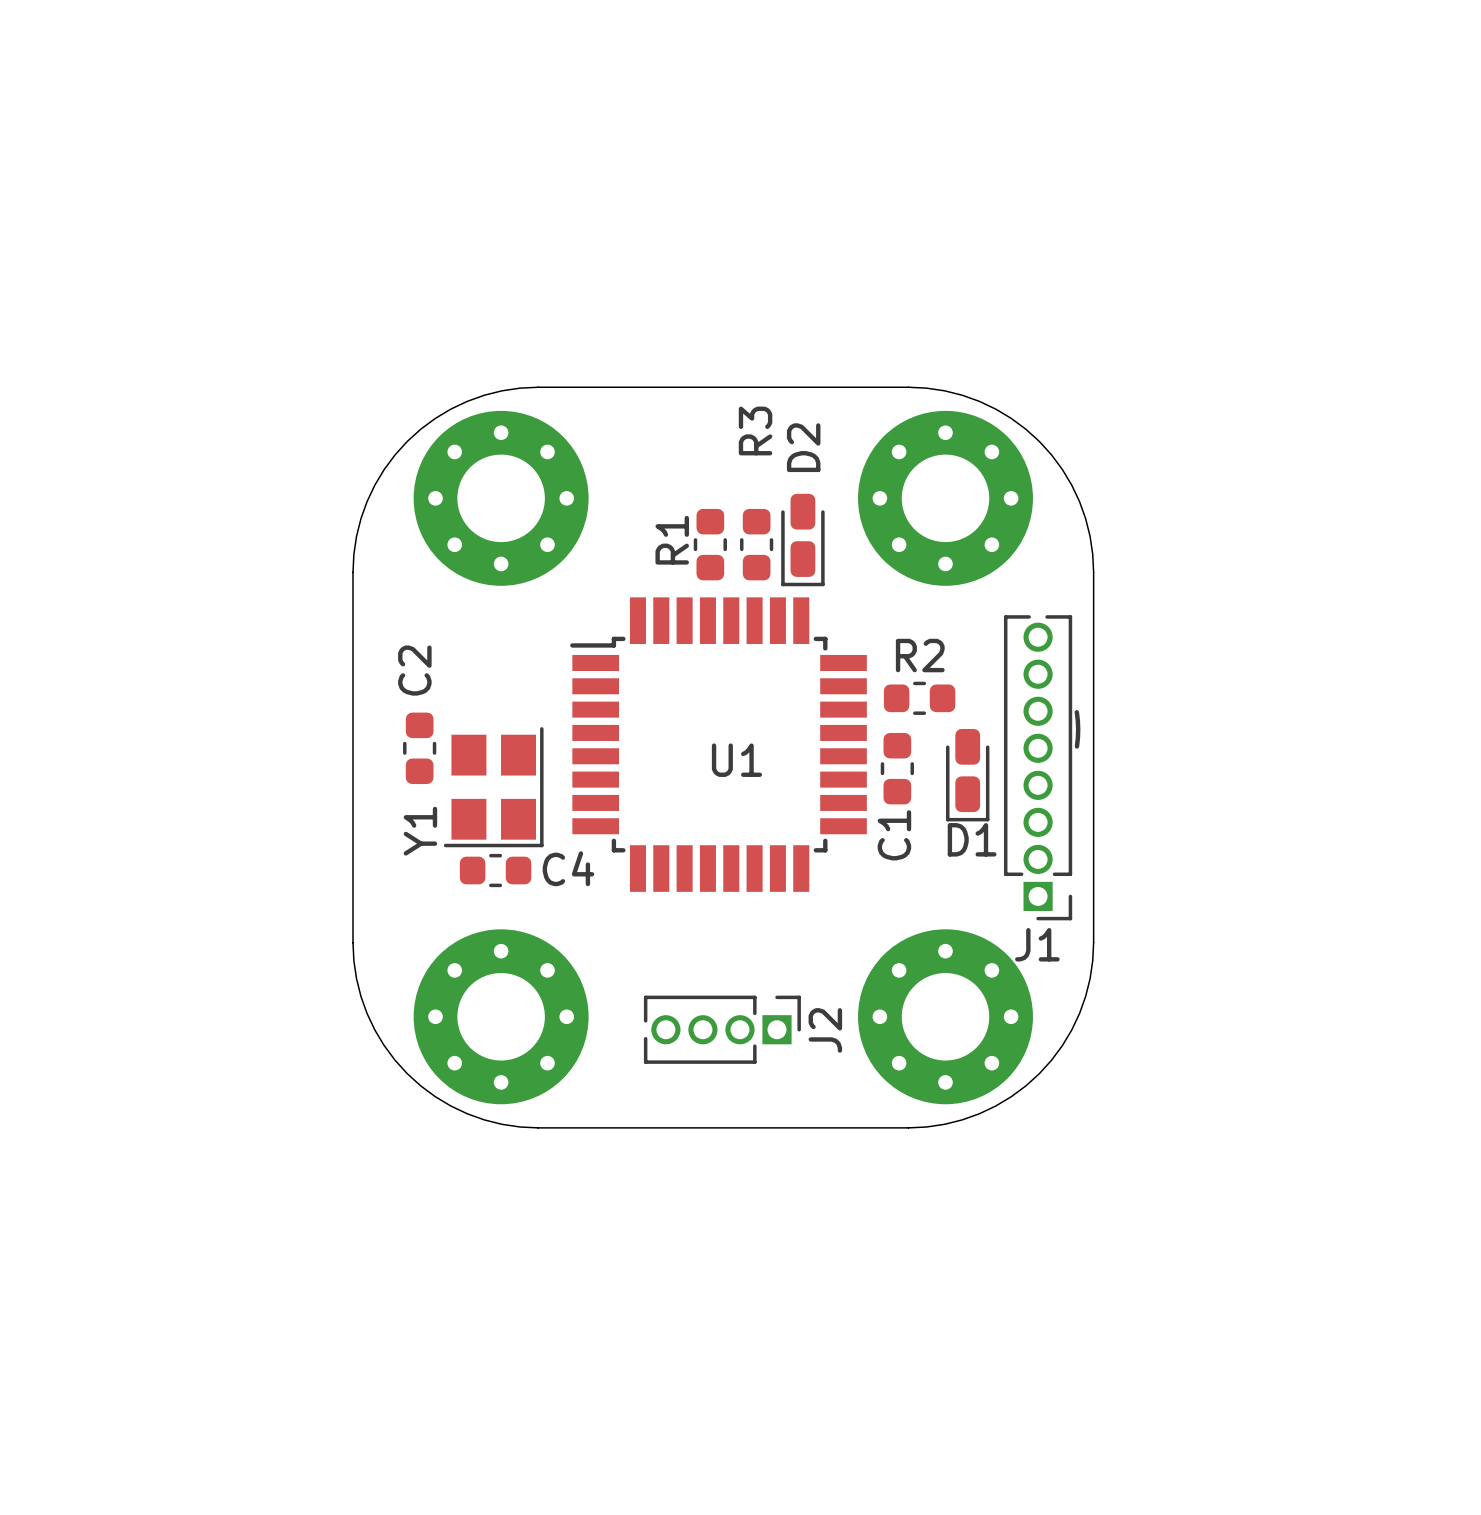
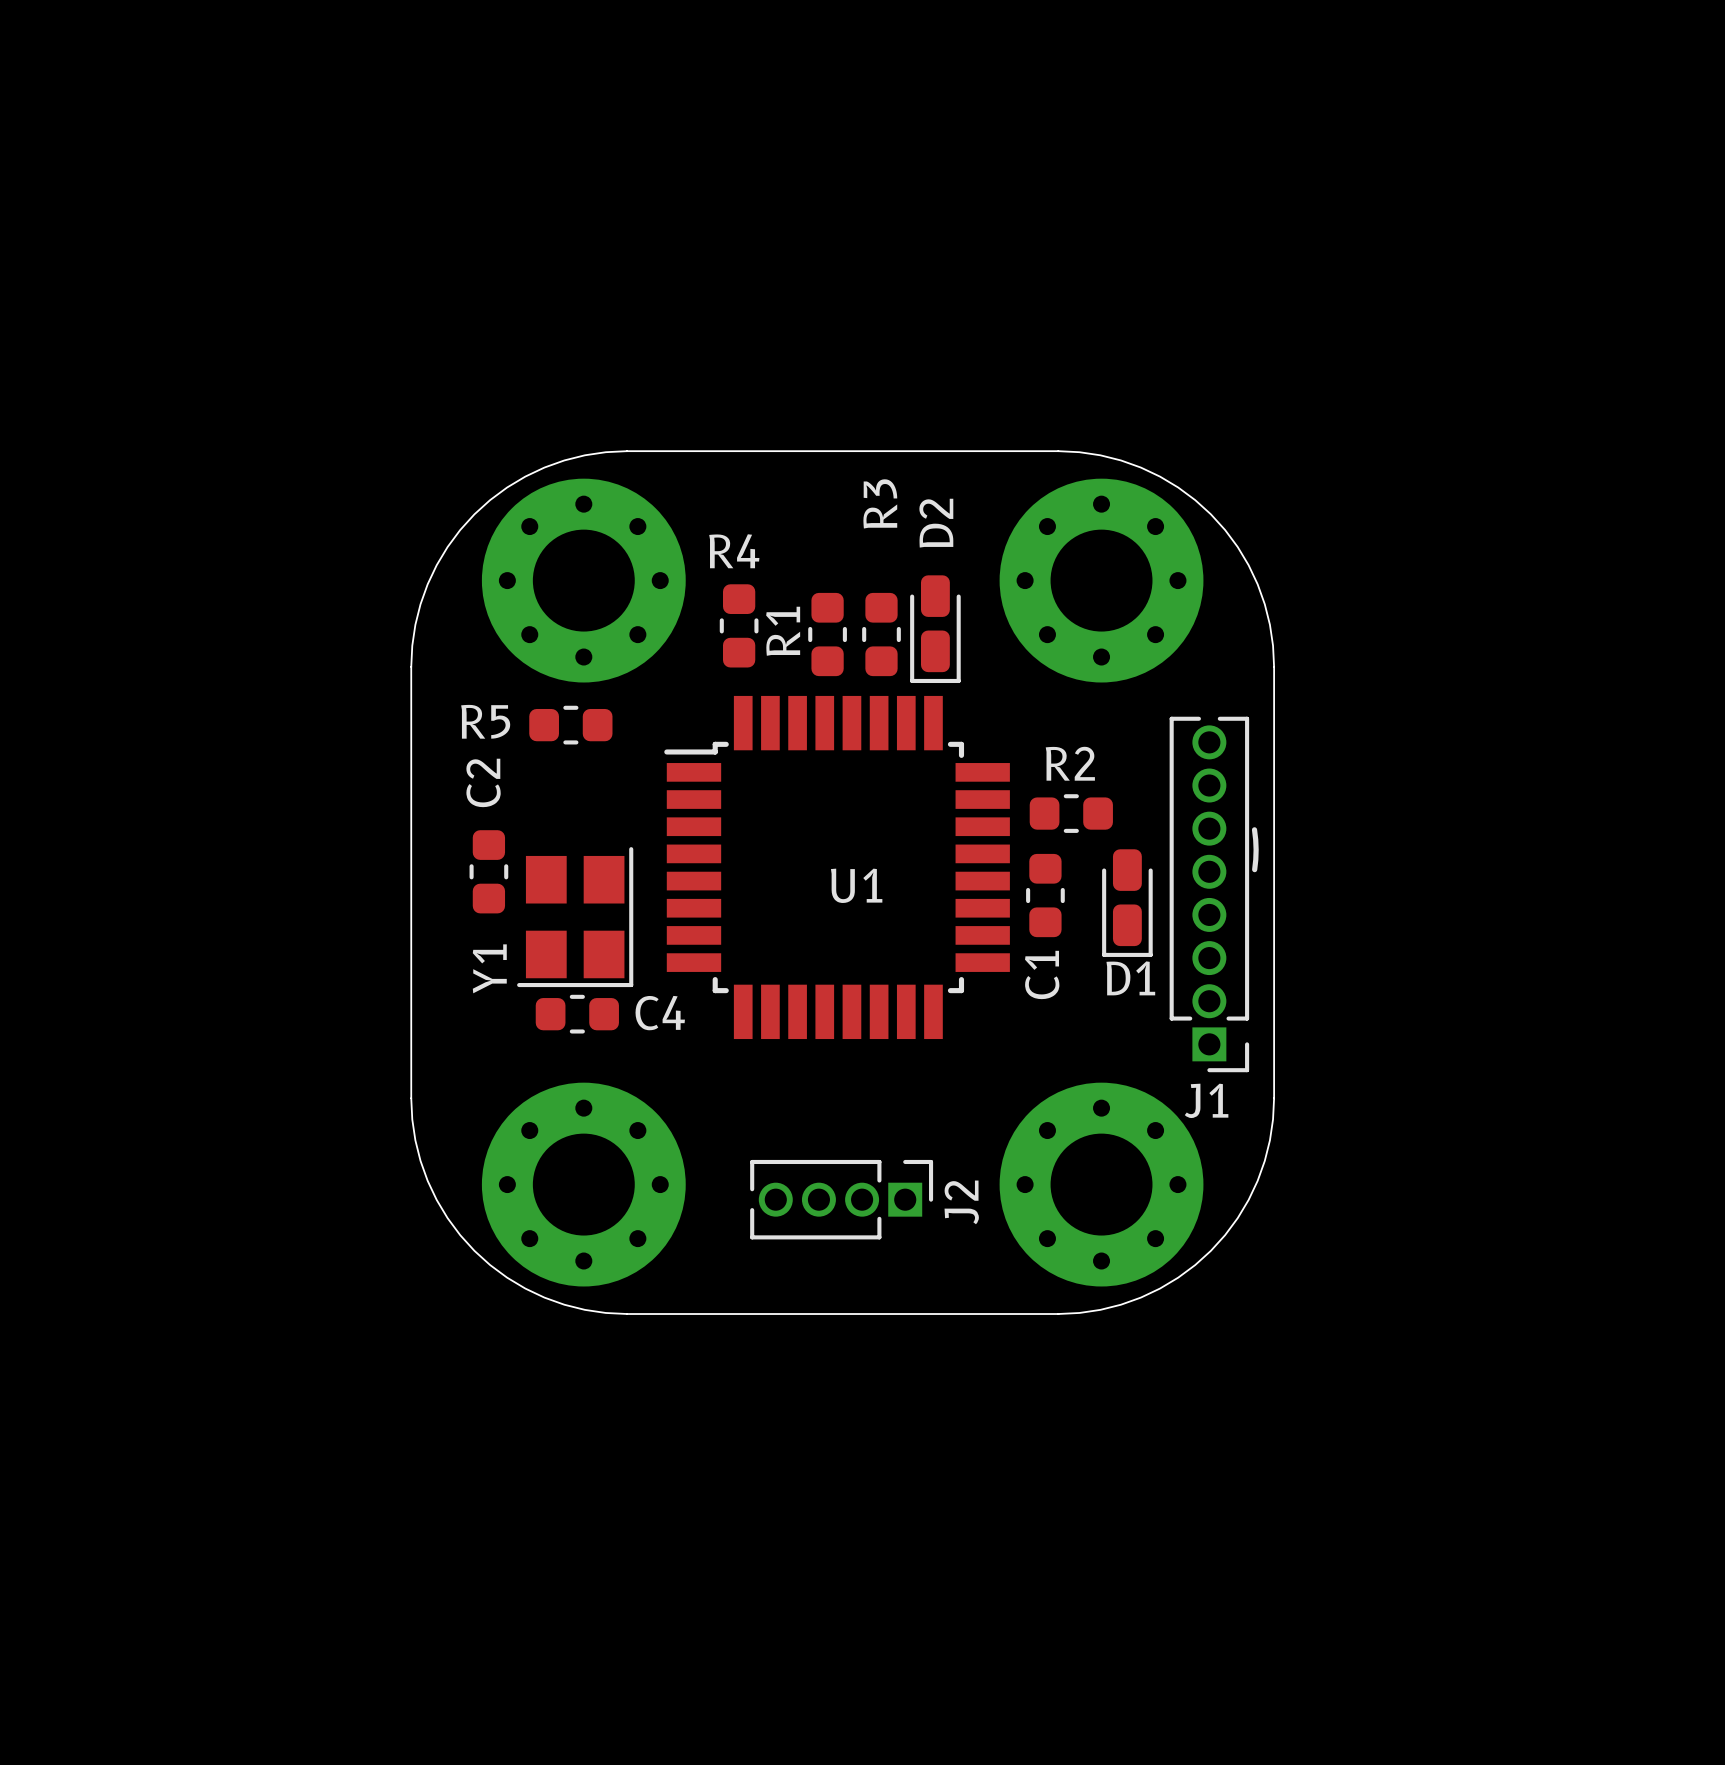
R4: none -> (739, 625)
R5: none -> (570, 725)

